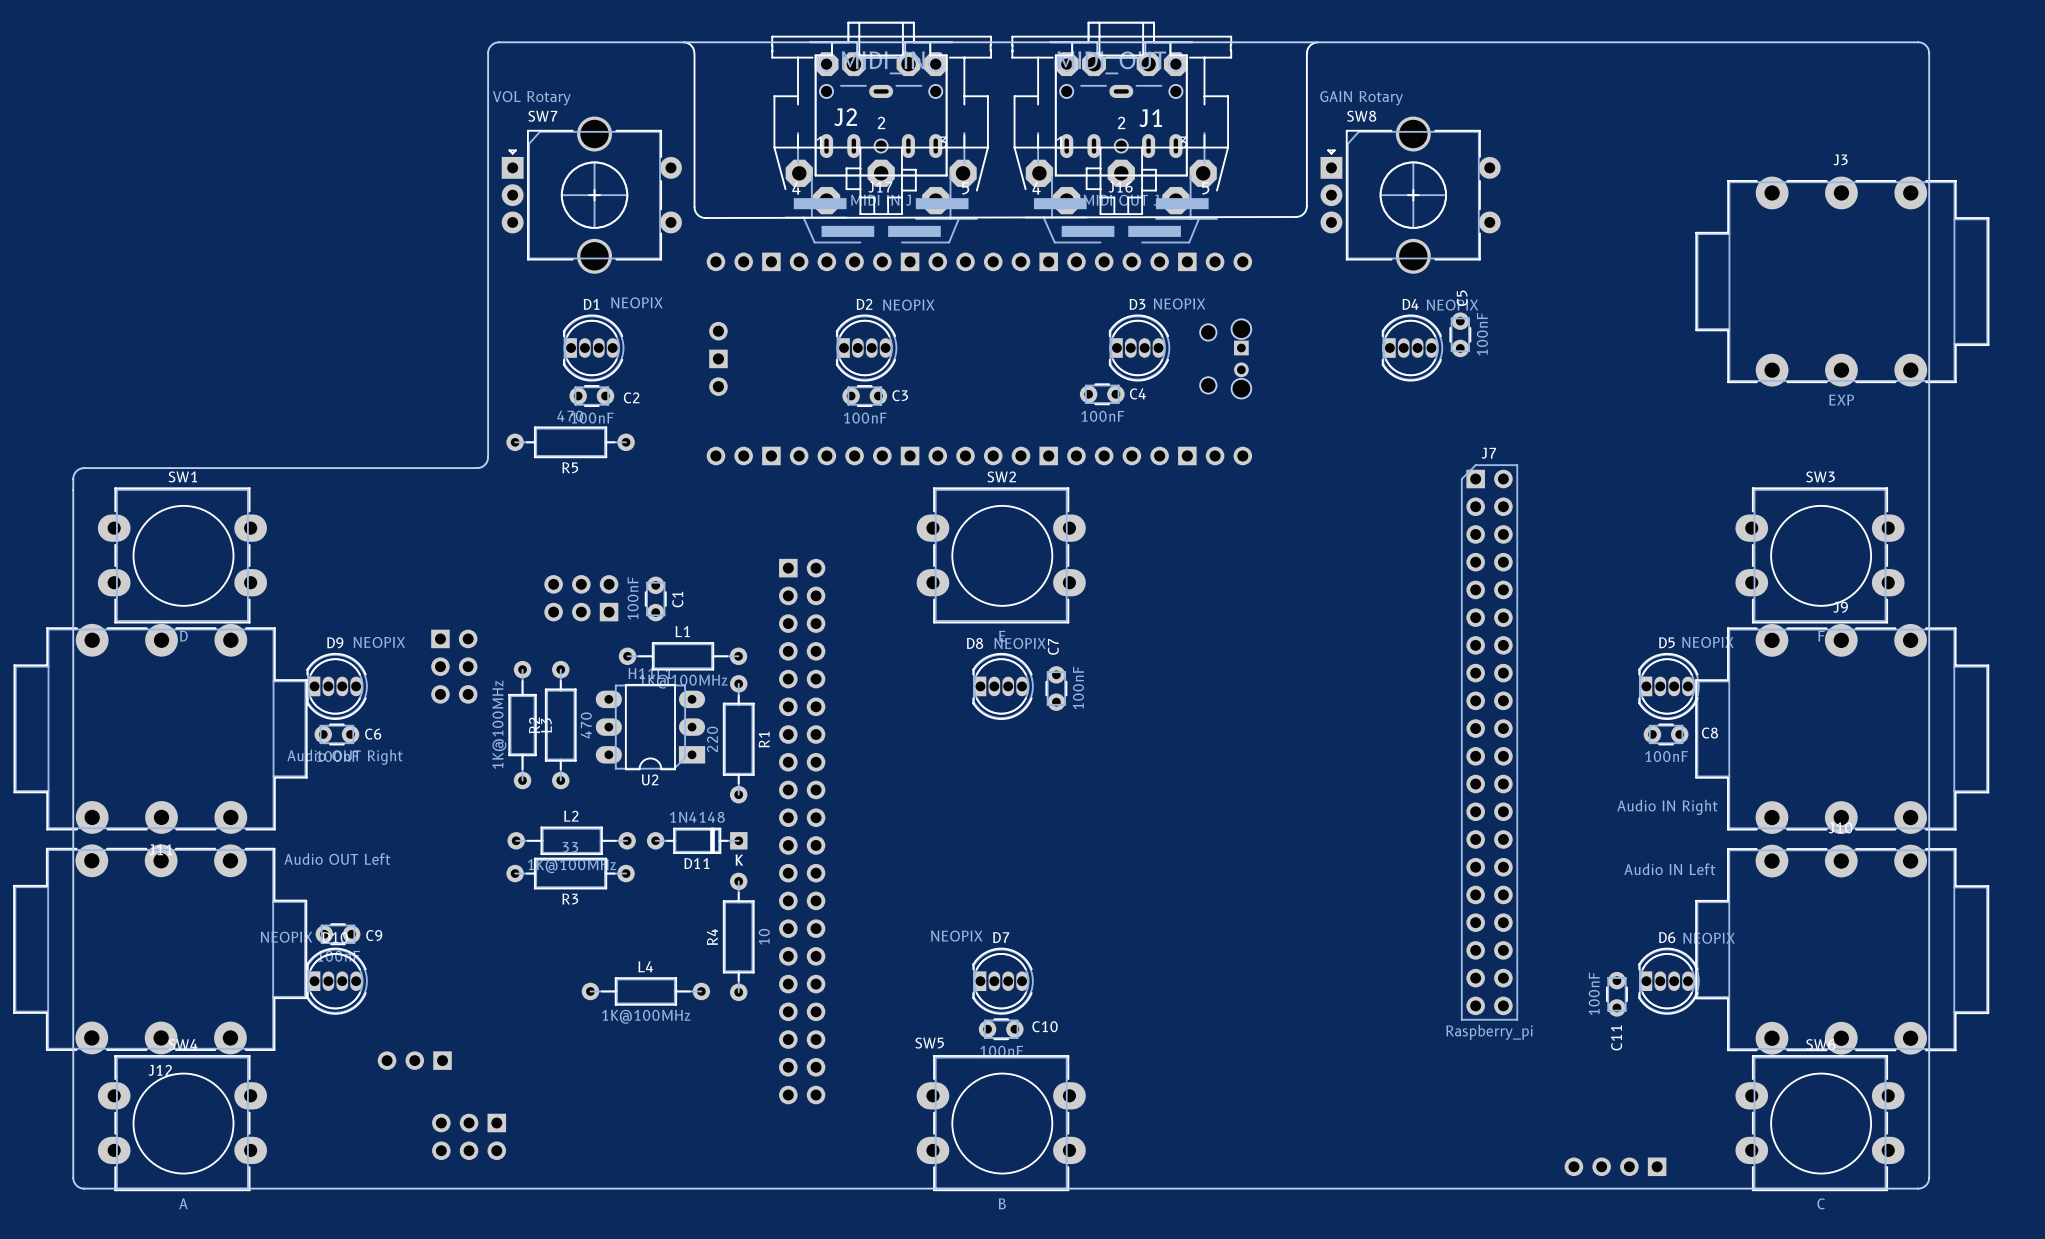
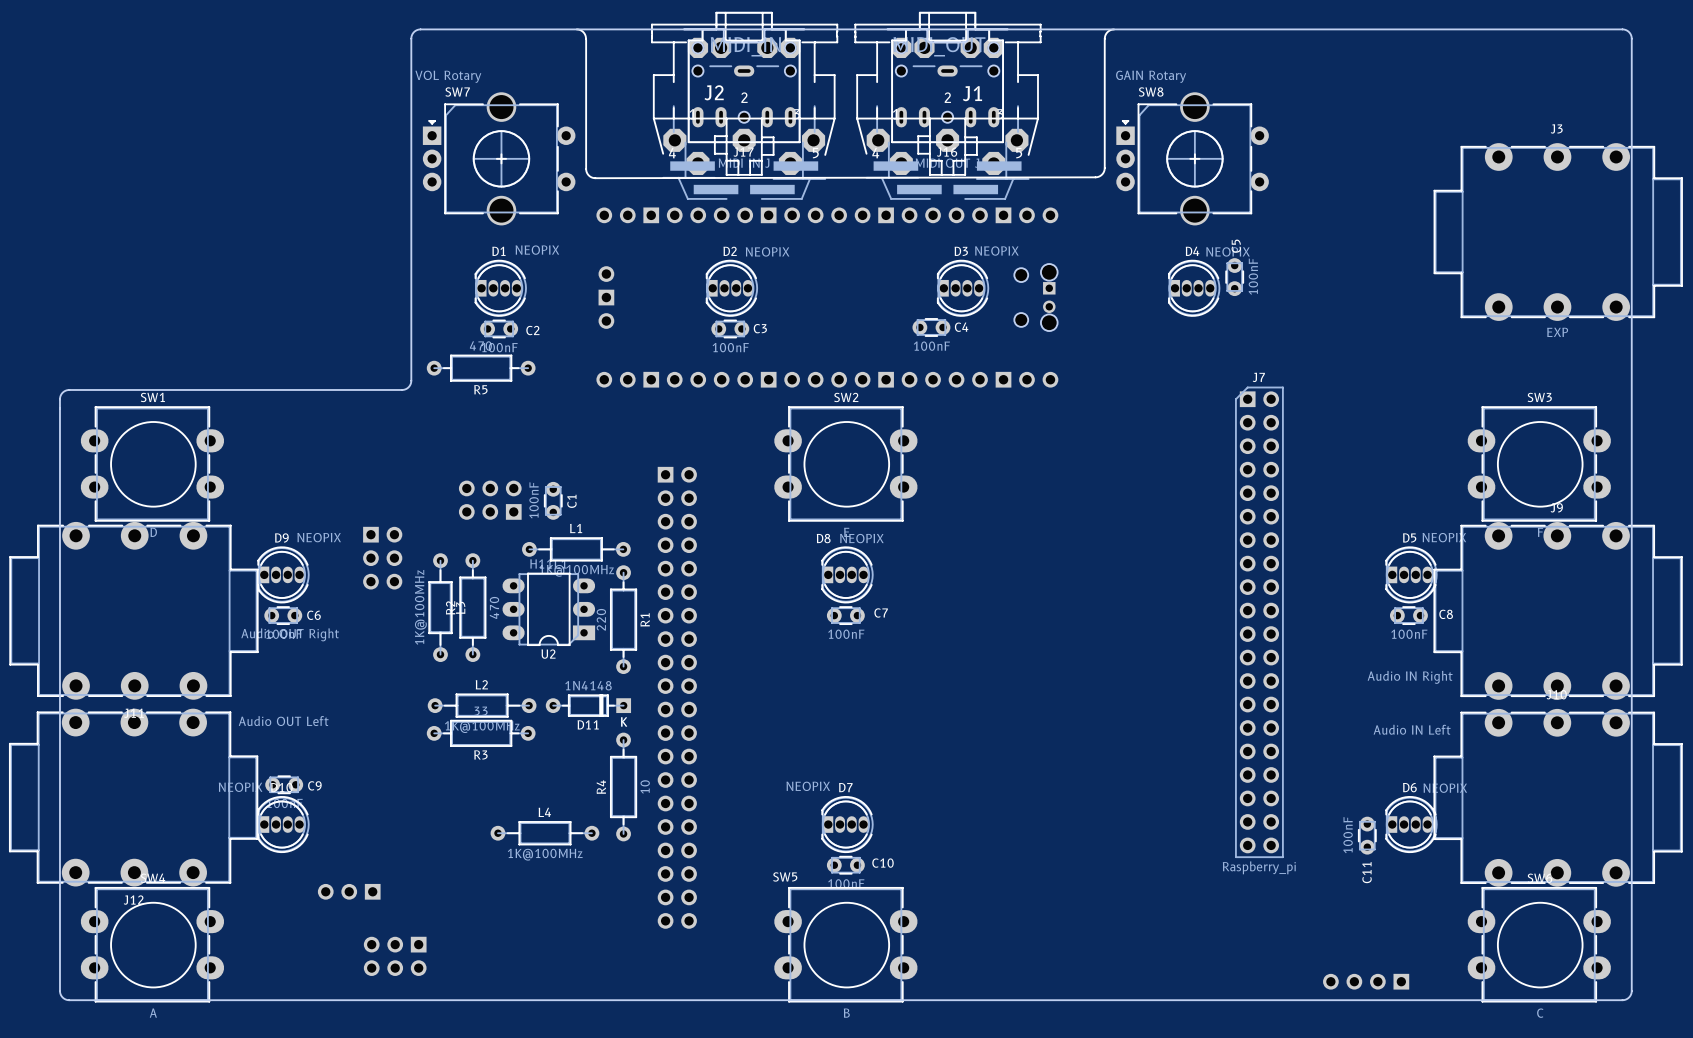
C7 rotation: 0° (1056, 688) -> 90° clockwise (845, 615)
C7 position: (1056, 688) -> (845, 615)

